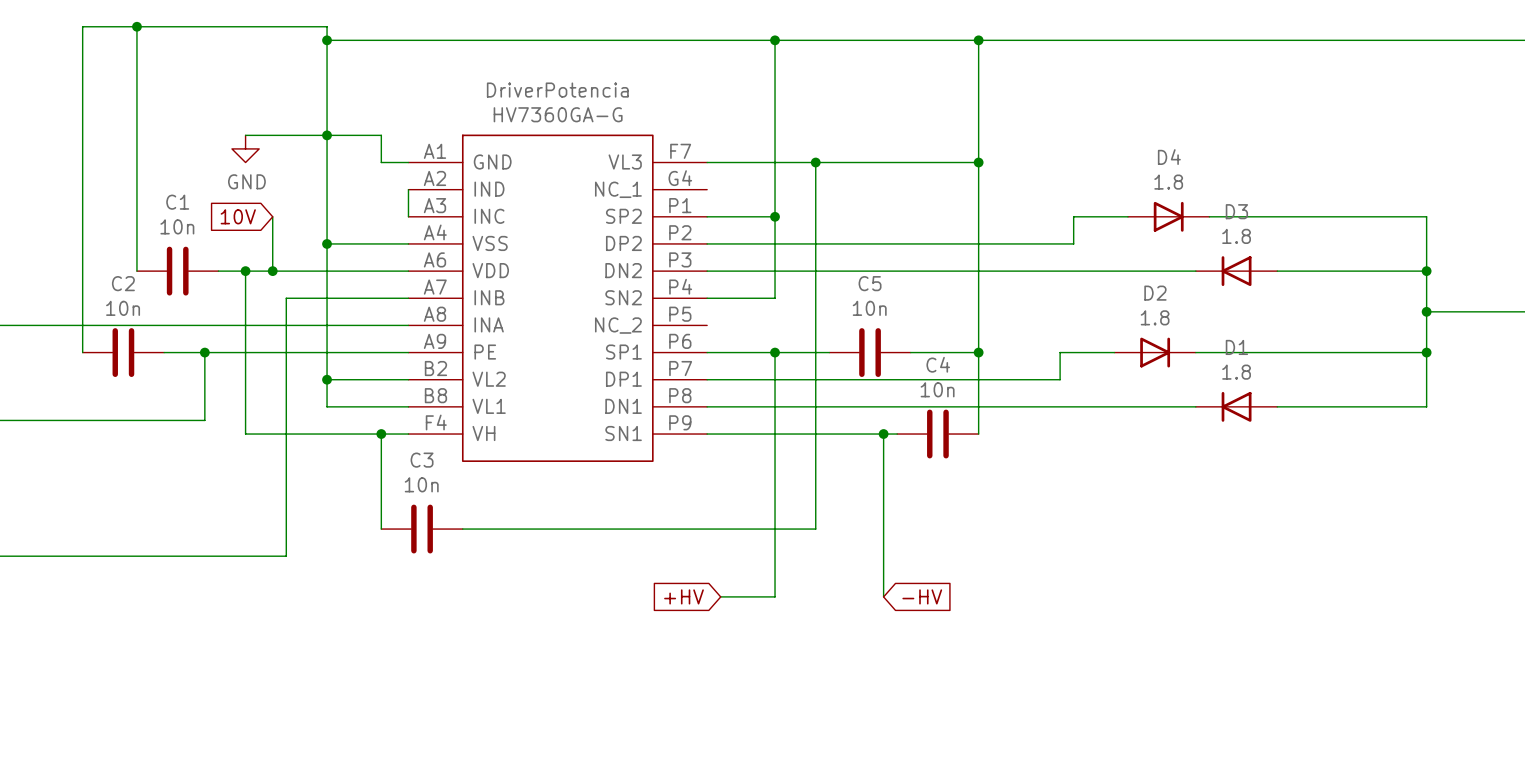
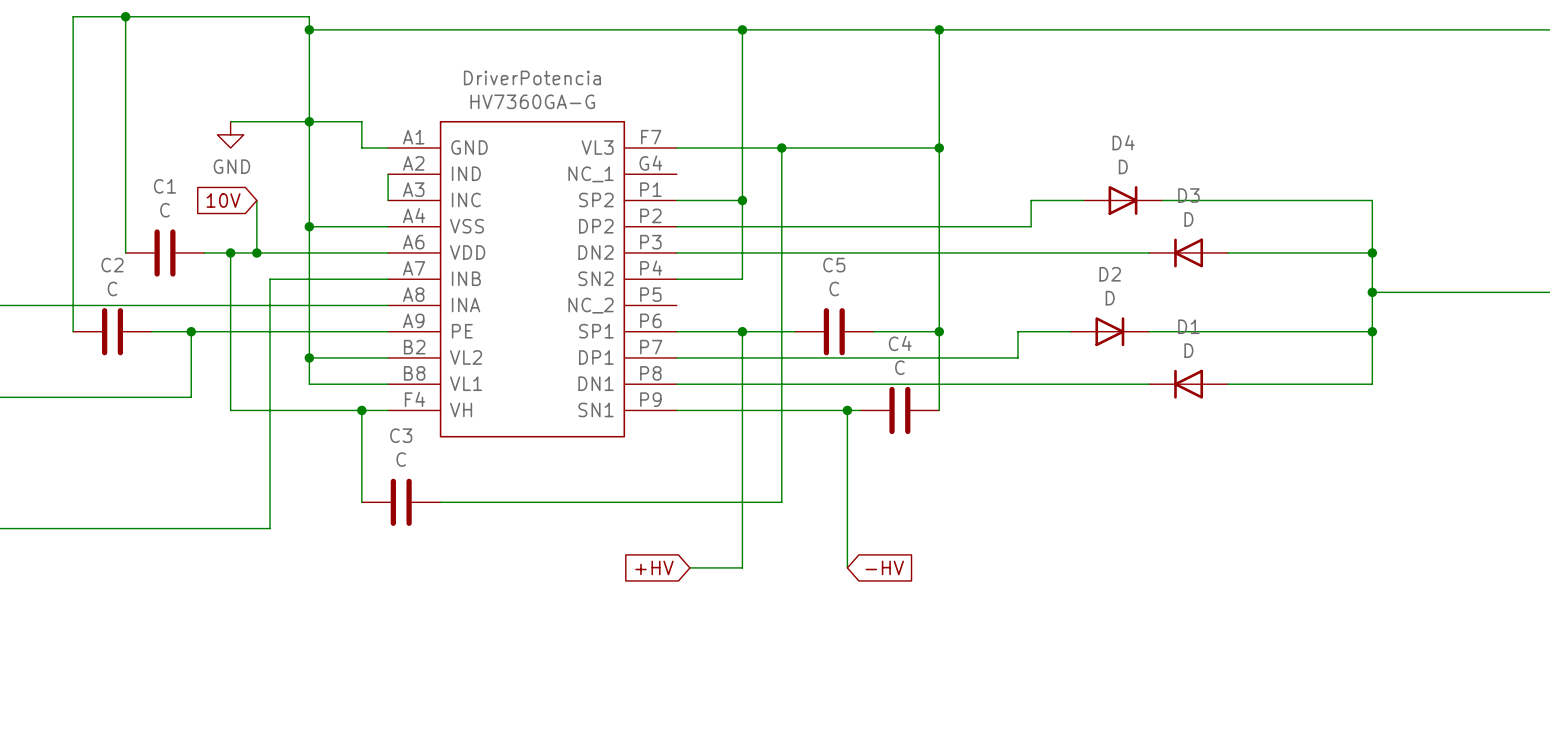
D4 value: 1.8 (1168, 182) -> D (1123, 166)
C1 value: 10n (177, 226) -> C (165, 210)
D3 value: 1.8 (1236, 236) -> D (1188, 219)
C2 value: 10n (123, 308) -> C (112, 288)
C5 value: 10n (869, 308) -> C (834, 288)
D2 value: 1.8 (1155, 317) -> D (1110, 298)
D1 value: 1.8 (1236, 372) -> D (1188, 350)
C4 value: 10n (937, 389) -> C (899, 367)
C3 value: 10n (421, 484) -> C (401, 459)

